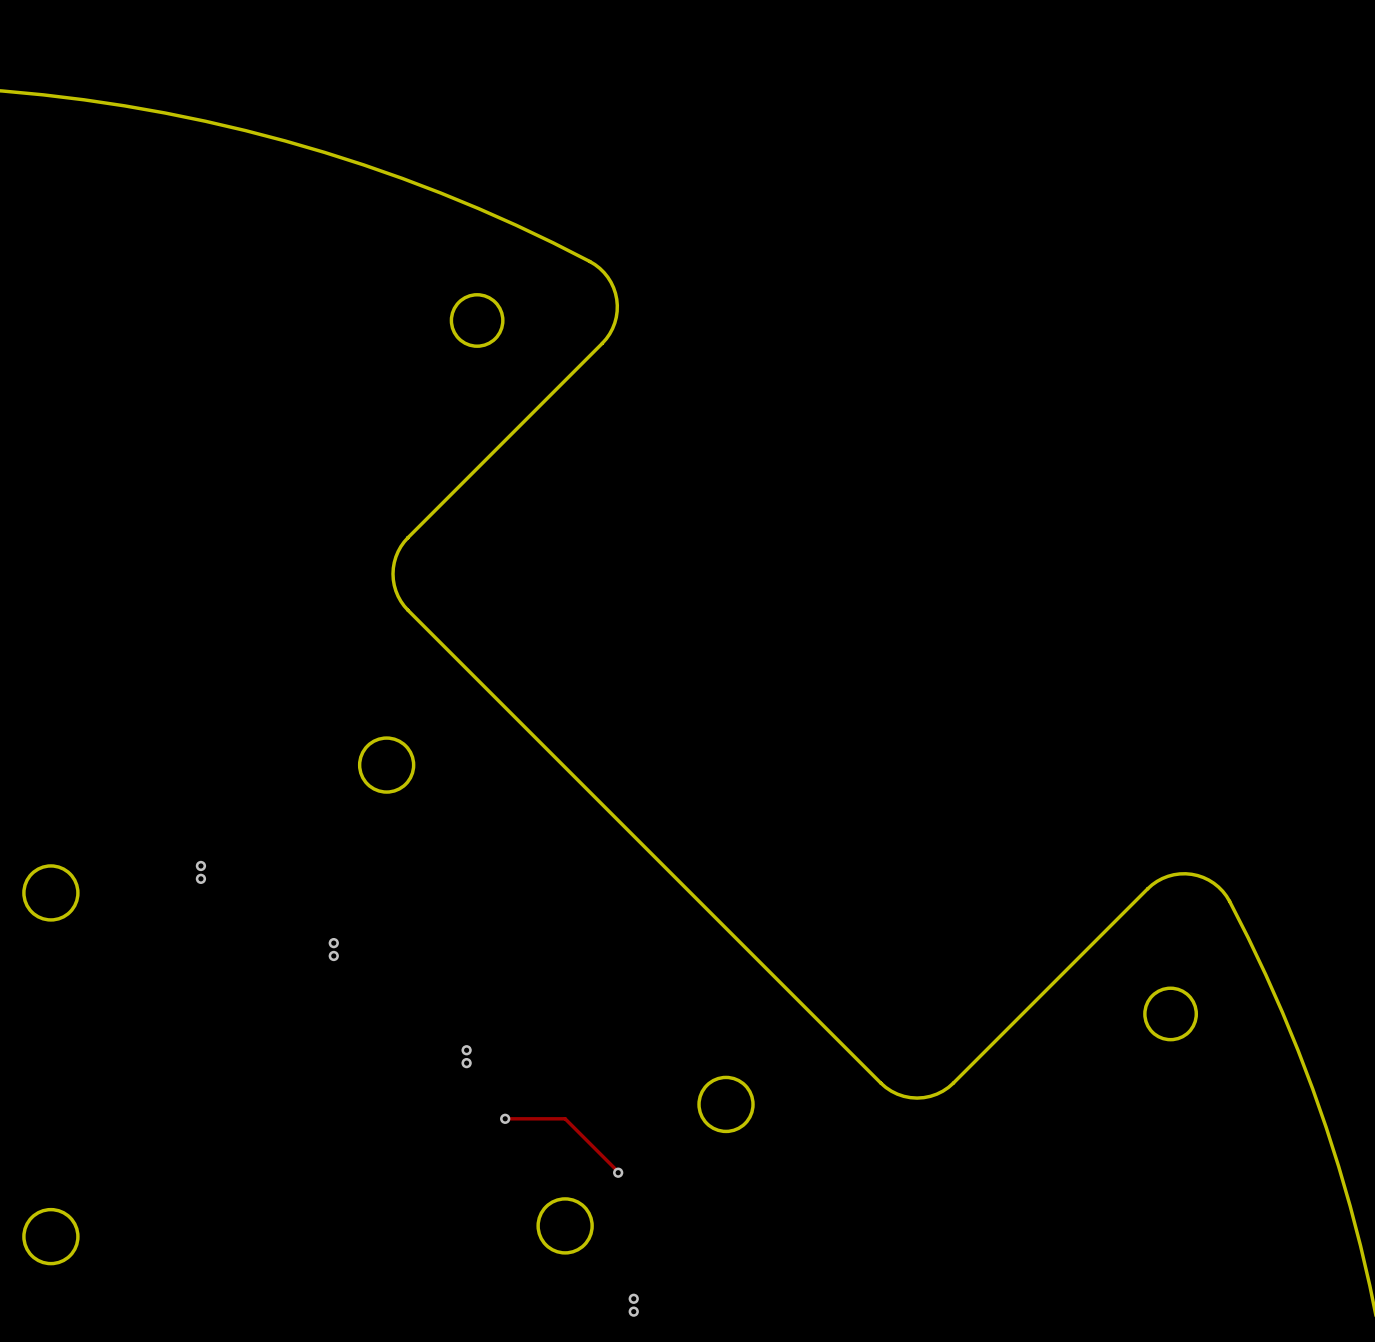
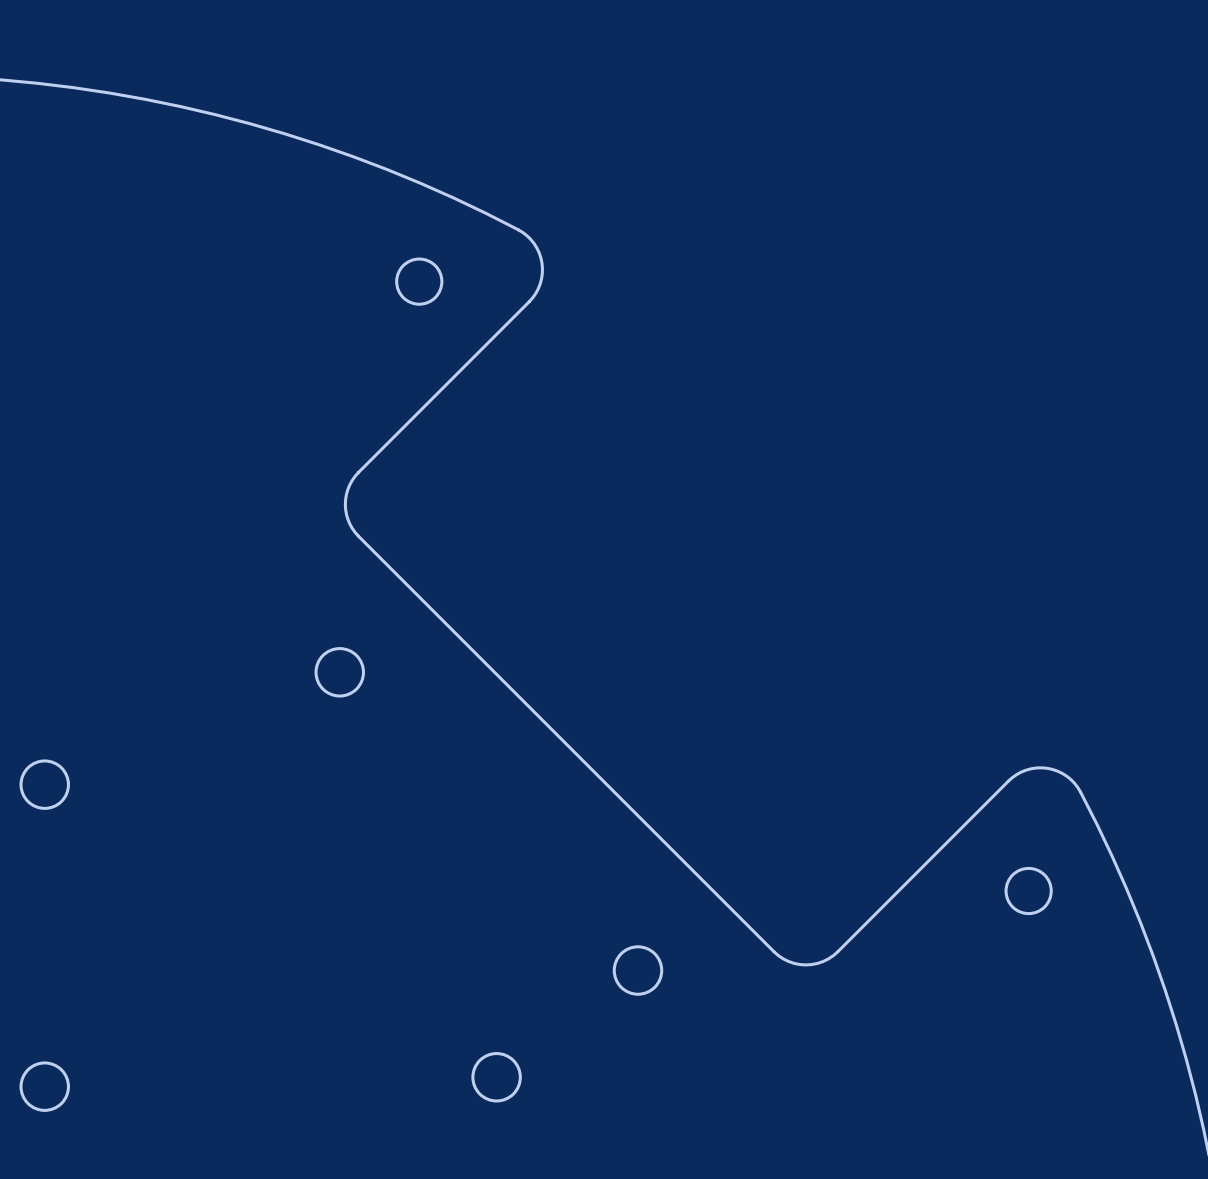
via: (200, 865) -> none
via: (200, 878) -> none
via: (333, 943) -> none
via: (333, 955) -> none
via: (466, 1050) -> none
via: (466, 1063) -> none
track: (505, 1118) (565, 1118) (618, 1172) -> none
via: (505, 1118) -> none
via: (618, 1172) -> none
via: (633, 1298) -> none
via: (633, 1311) -> none

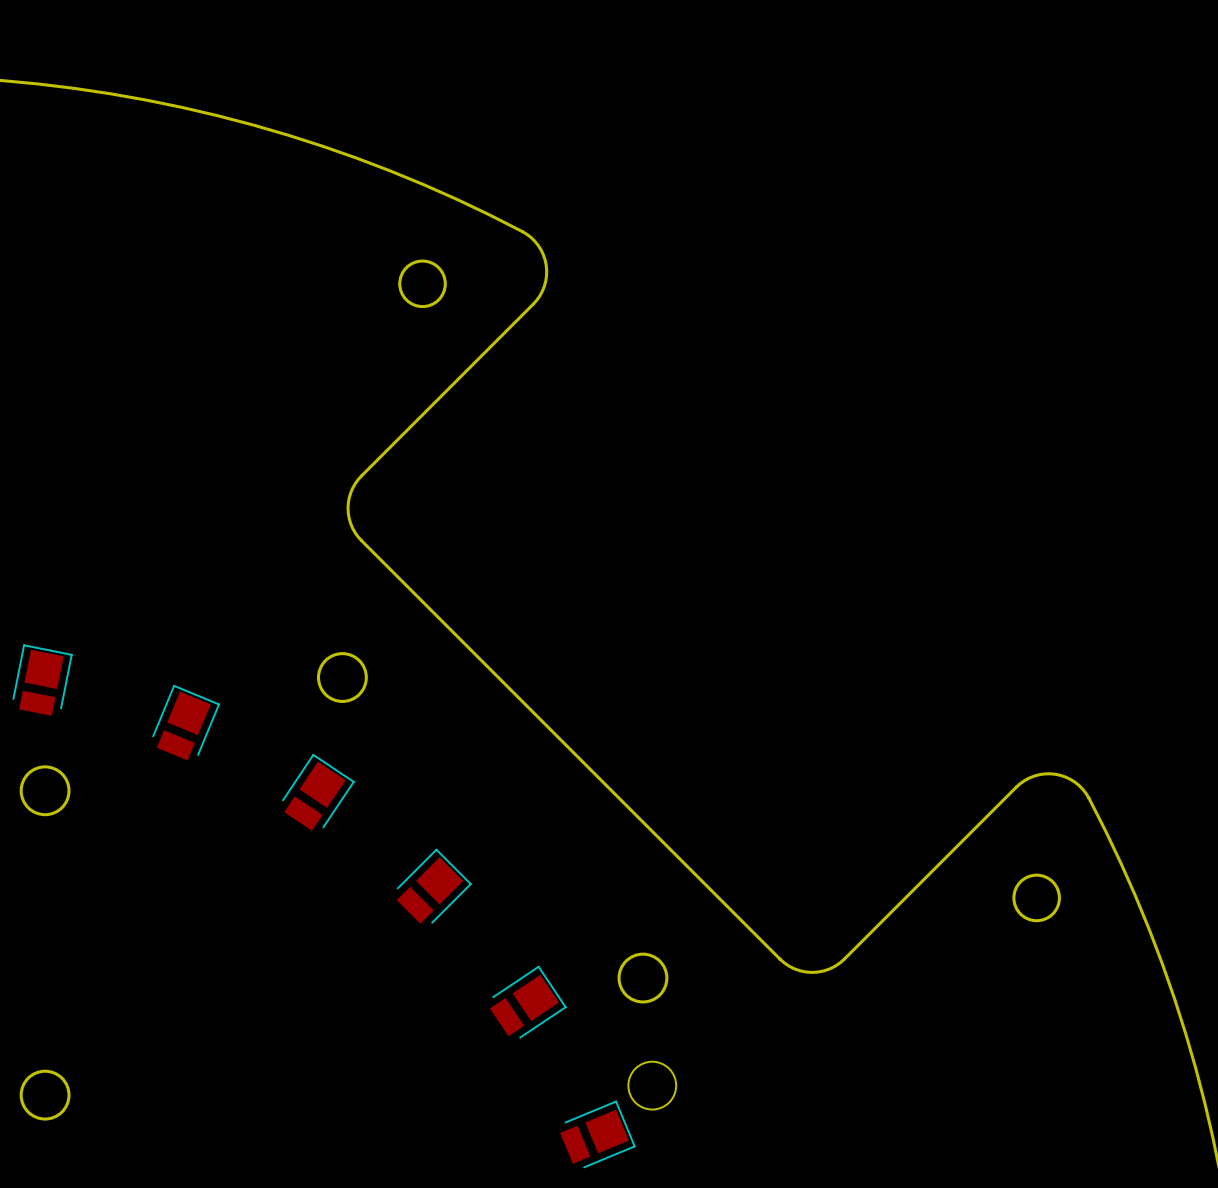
part: none -> (42, 680)
part: none -> (186, 722)
part: none -> (318, 792)
part: none -> (434, 886)
part: none -> (528, 1002)
round board edge: [471, 1052, 522, 1103] -> none
round board edge: none -> [627, 1061, 677, 1110]
part: none -> (597, 1134)

